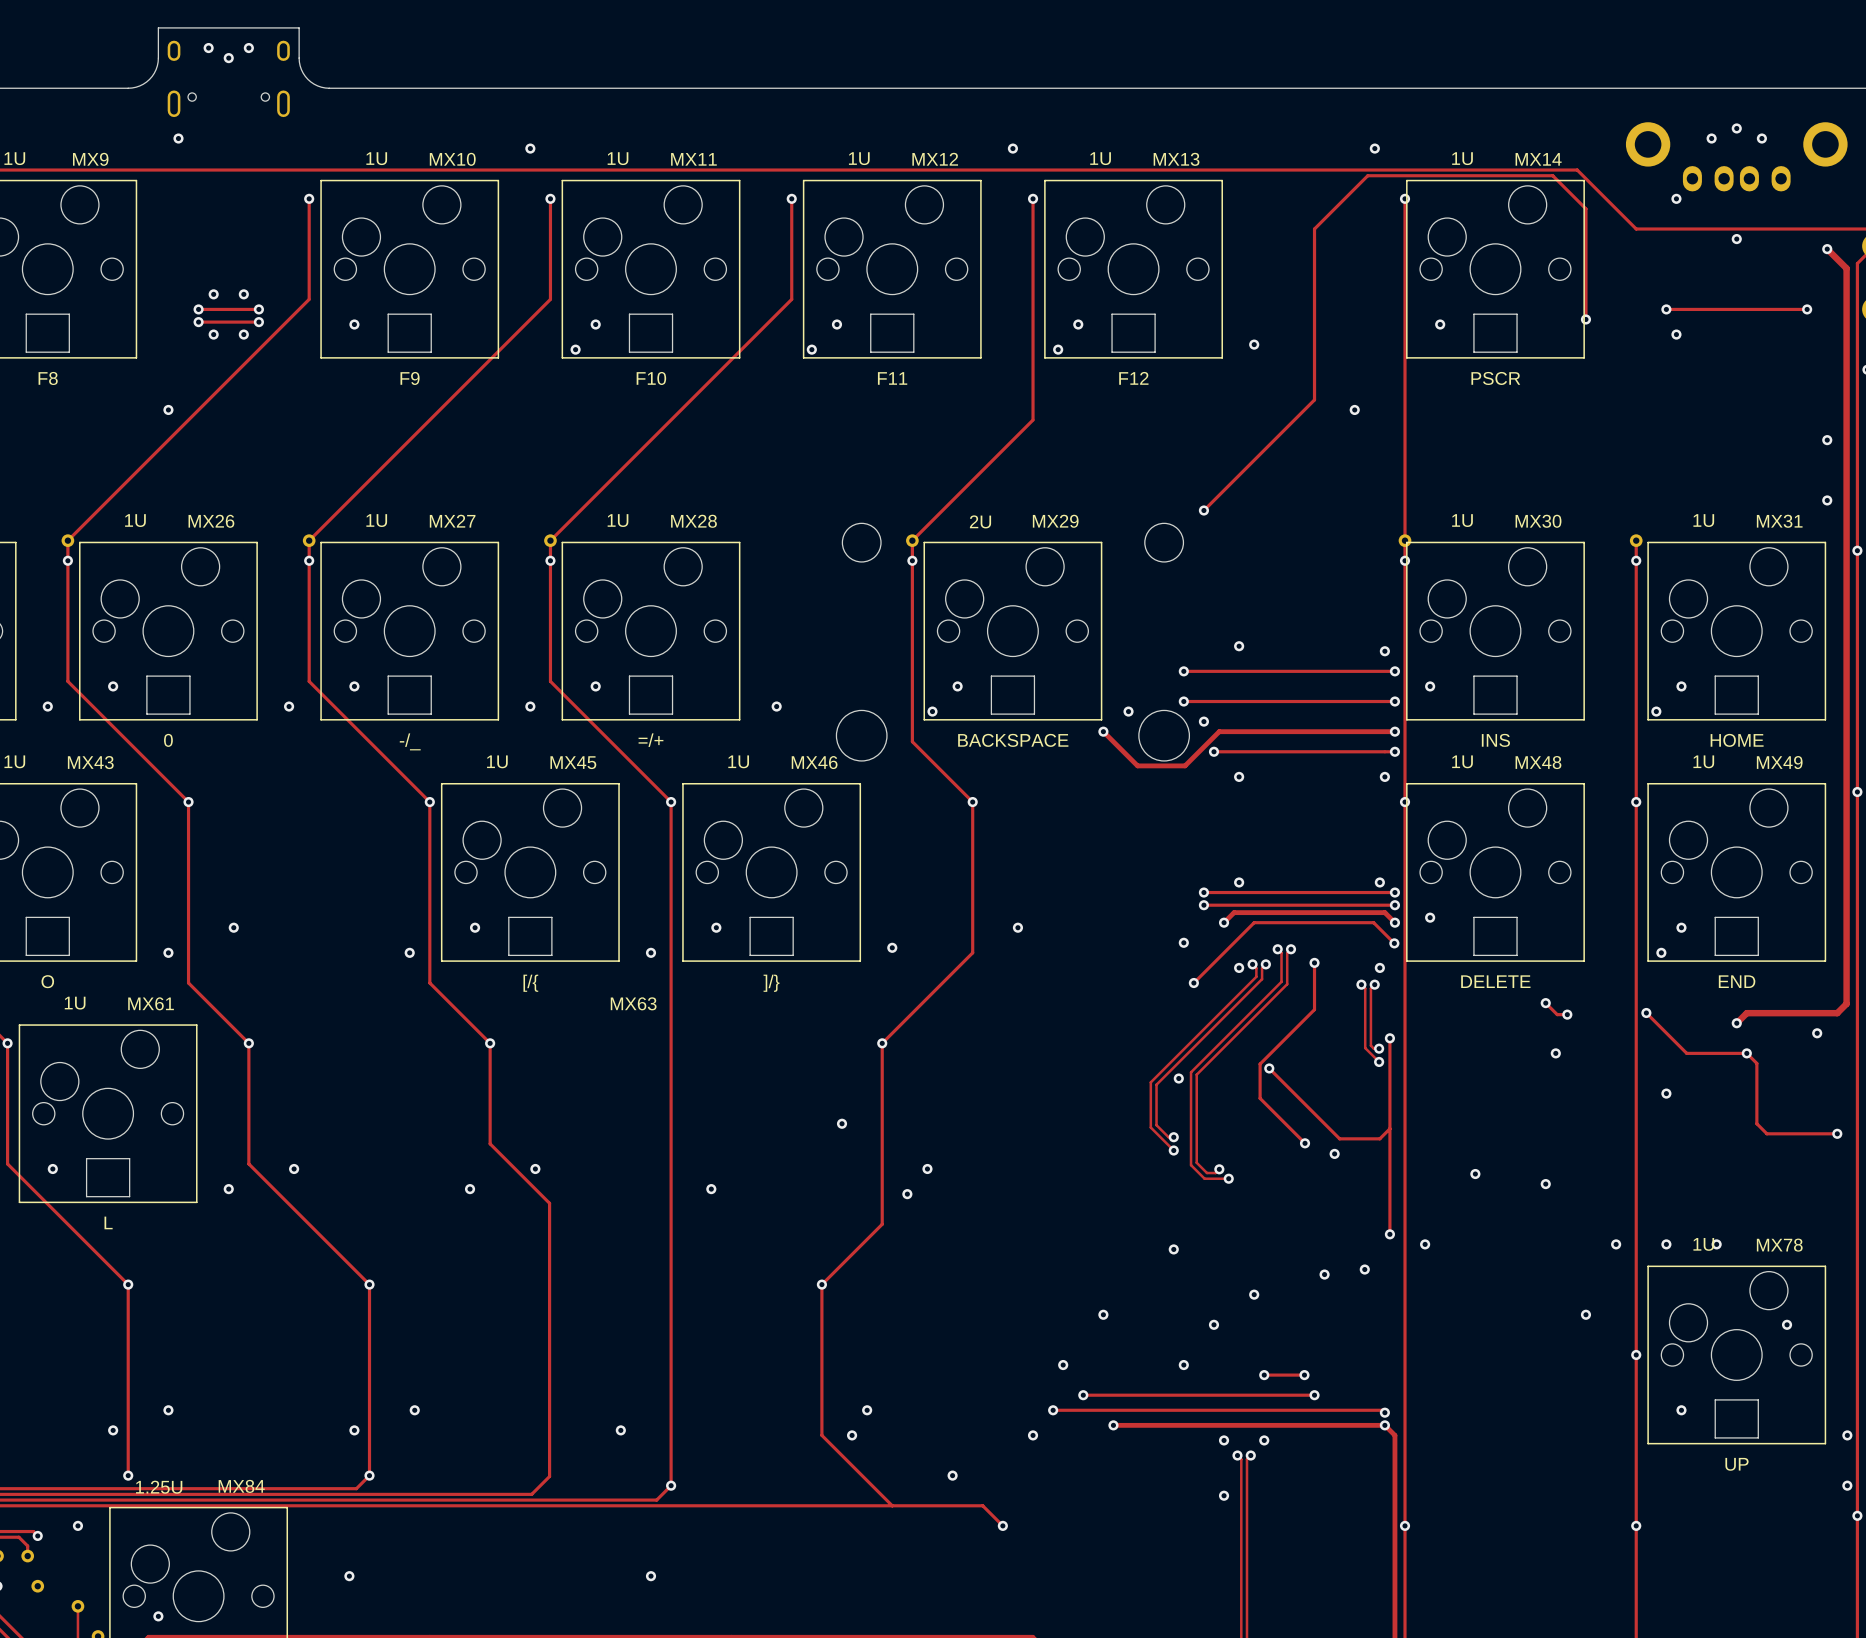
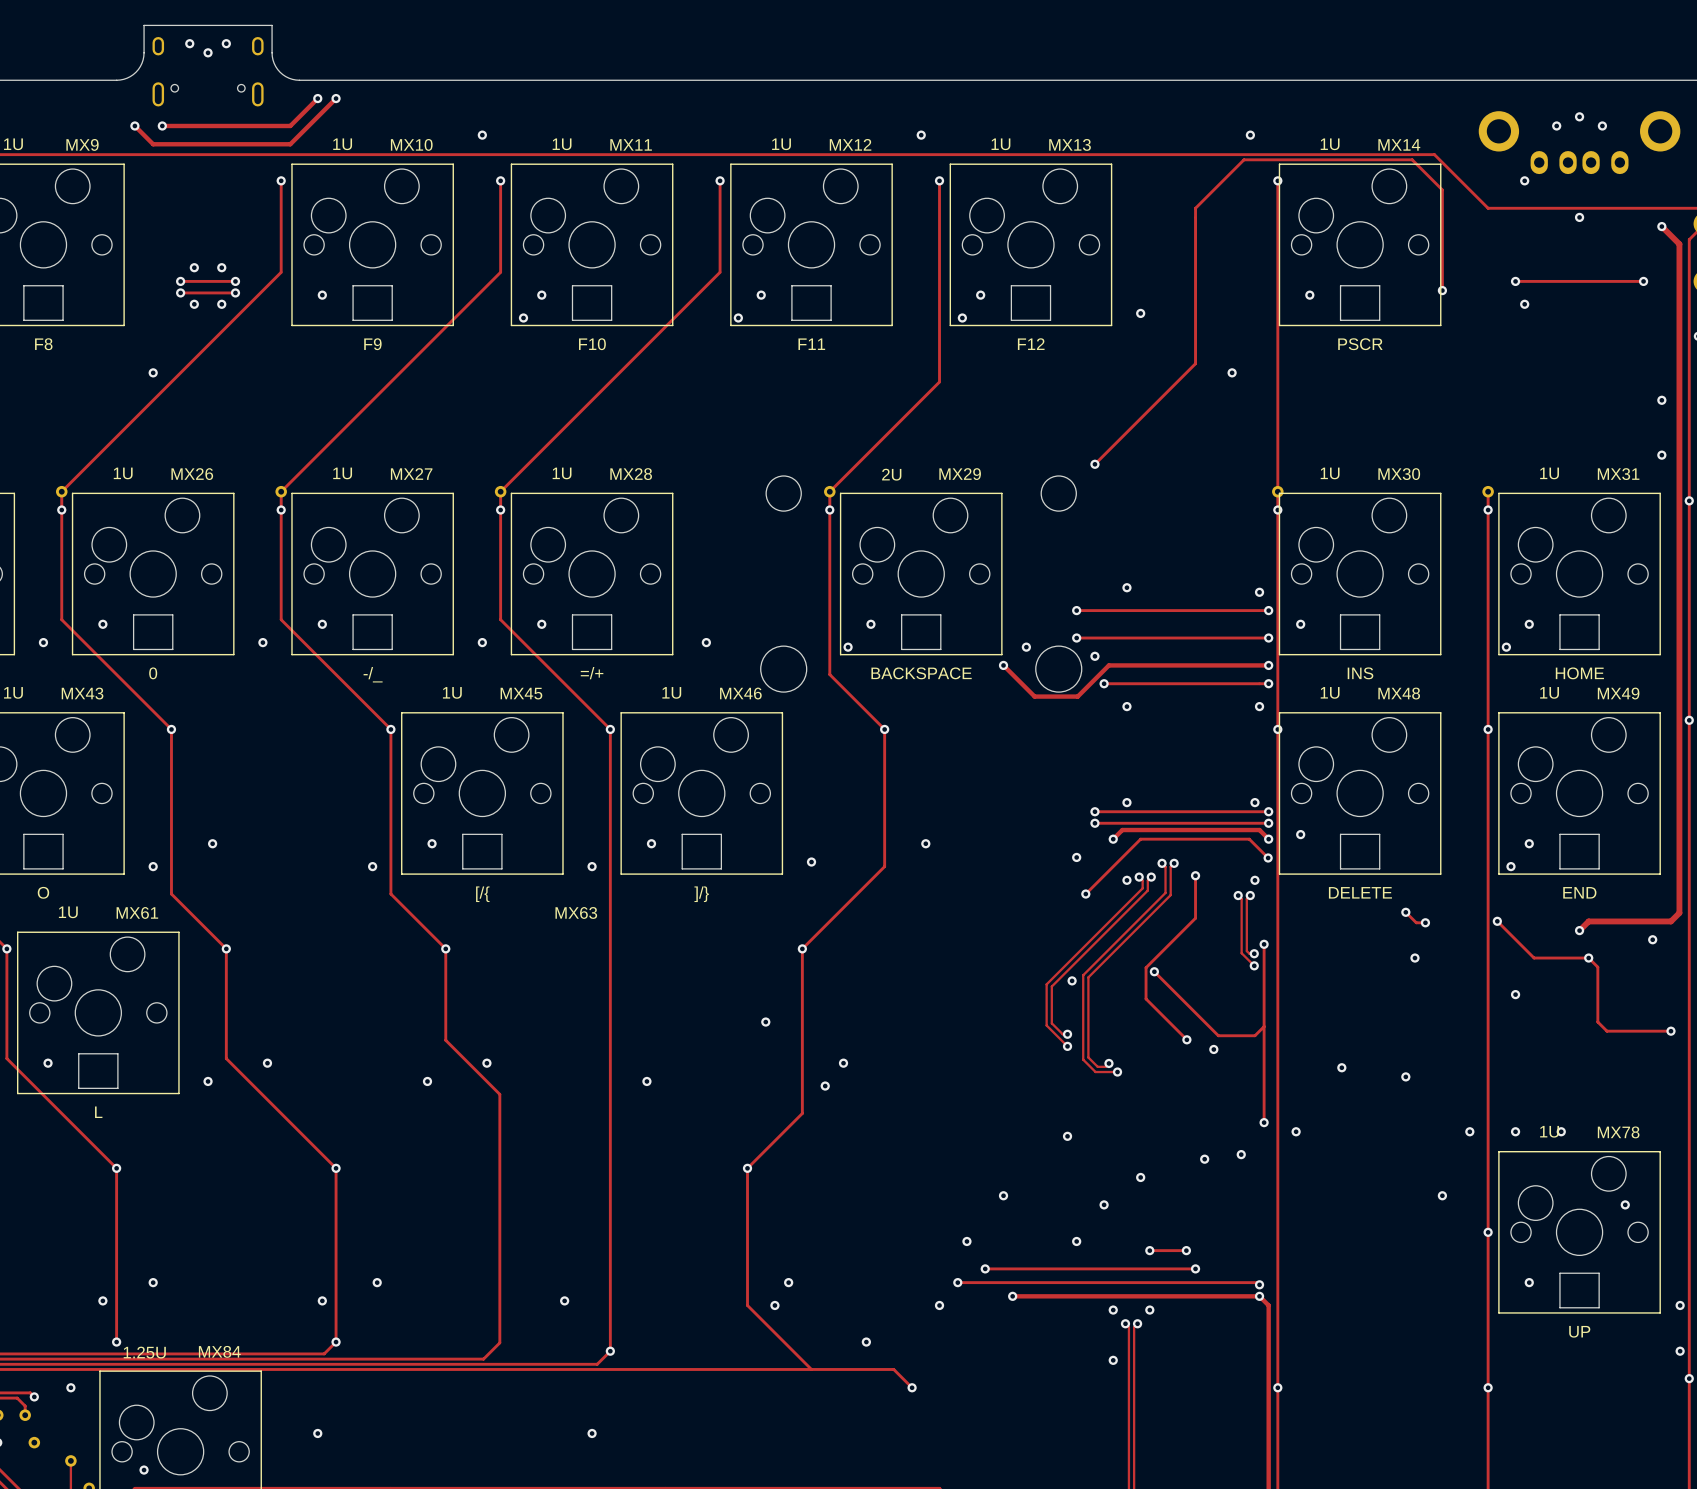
track: none -> (317, 98) (290, 125) (162, 125)
via: none -> (317, 98)
track: none -> (336, 98) (290, 144) (153, 144) (134, 125)
via: none -> (336, 98)
via: none -> (134, 125)

